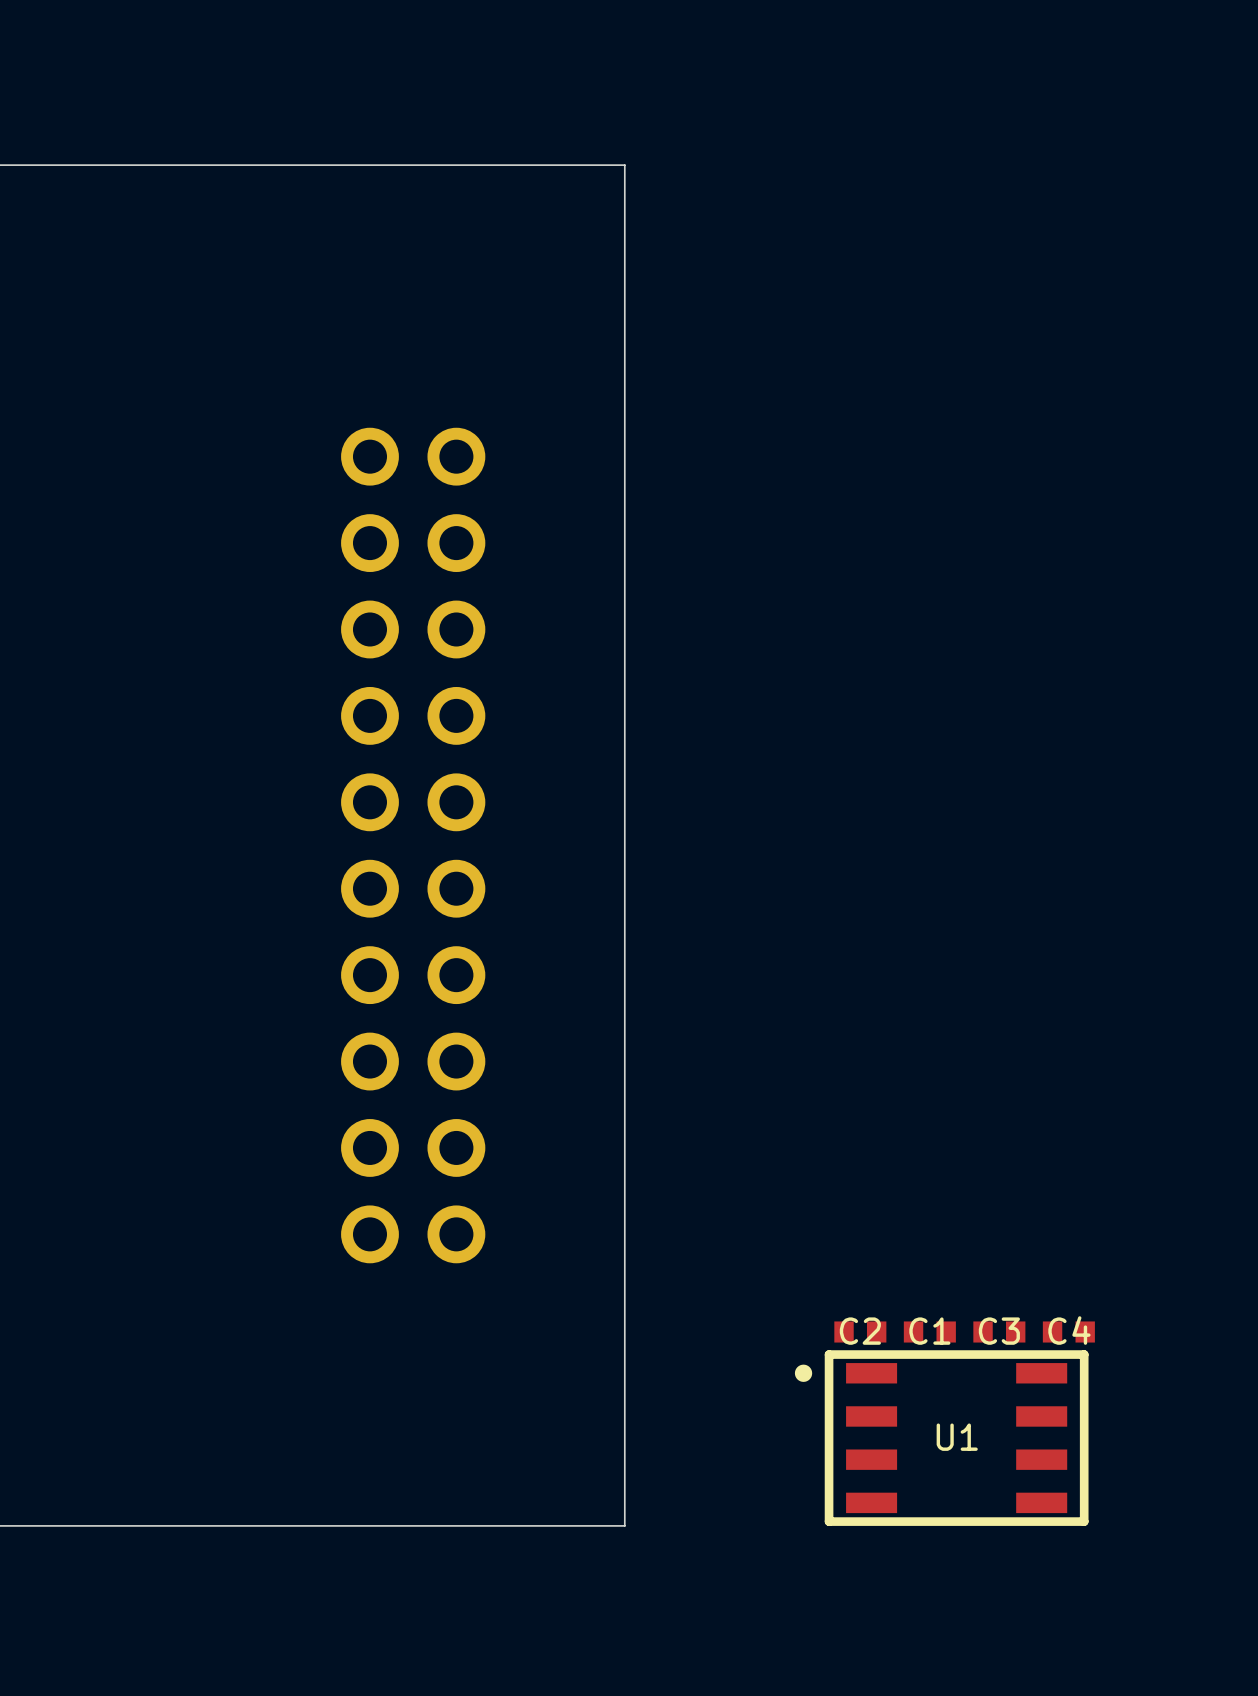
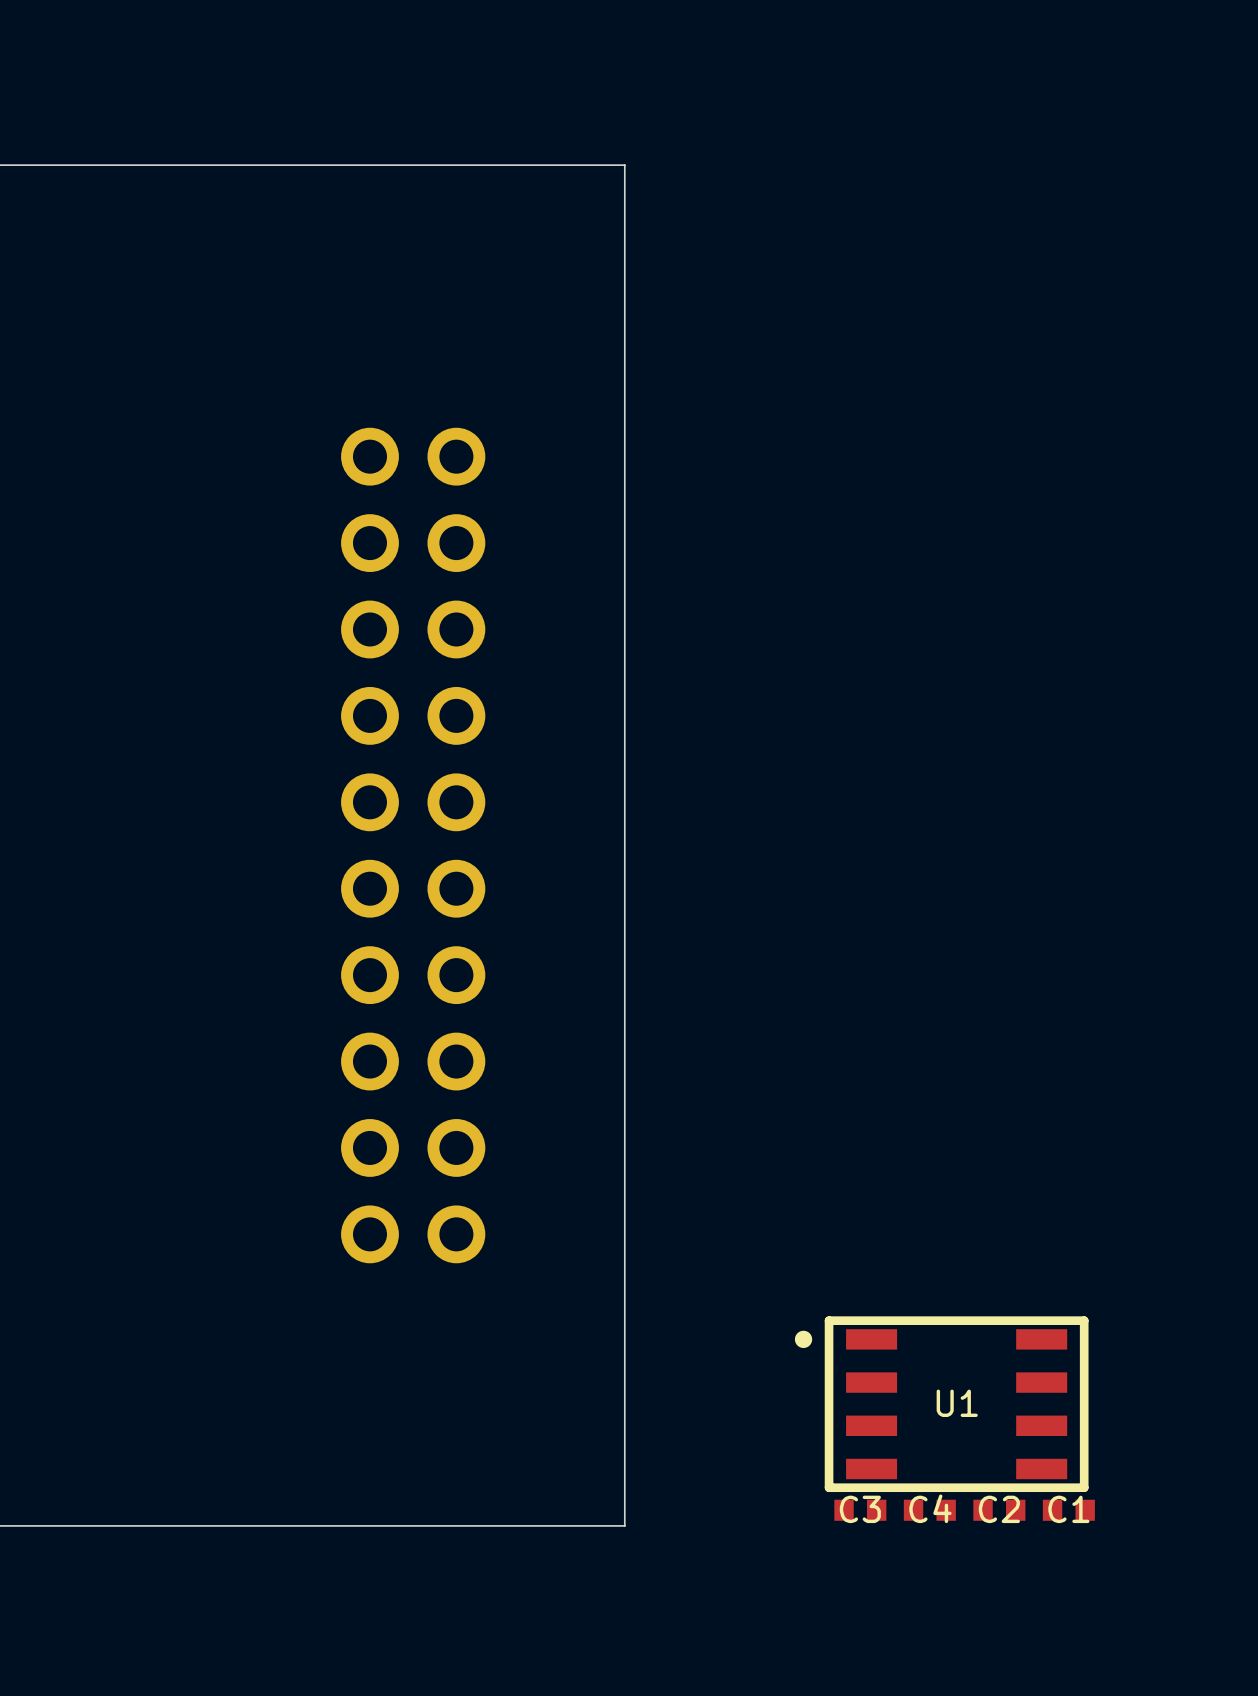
C2 position: (860, 1331) -> (999, 1510)
C1 position: (929, 1331) -> (1068, 1510)
C3 position: (999, 1331) -> (860, 1510)
C4 position: (1068, 1331) -> (929, 1510)
U1 position: (941, 1438) -> (941, 1404)

